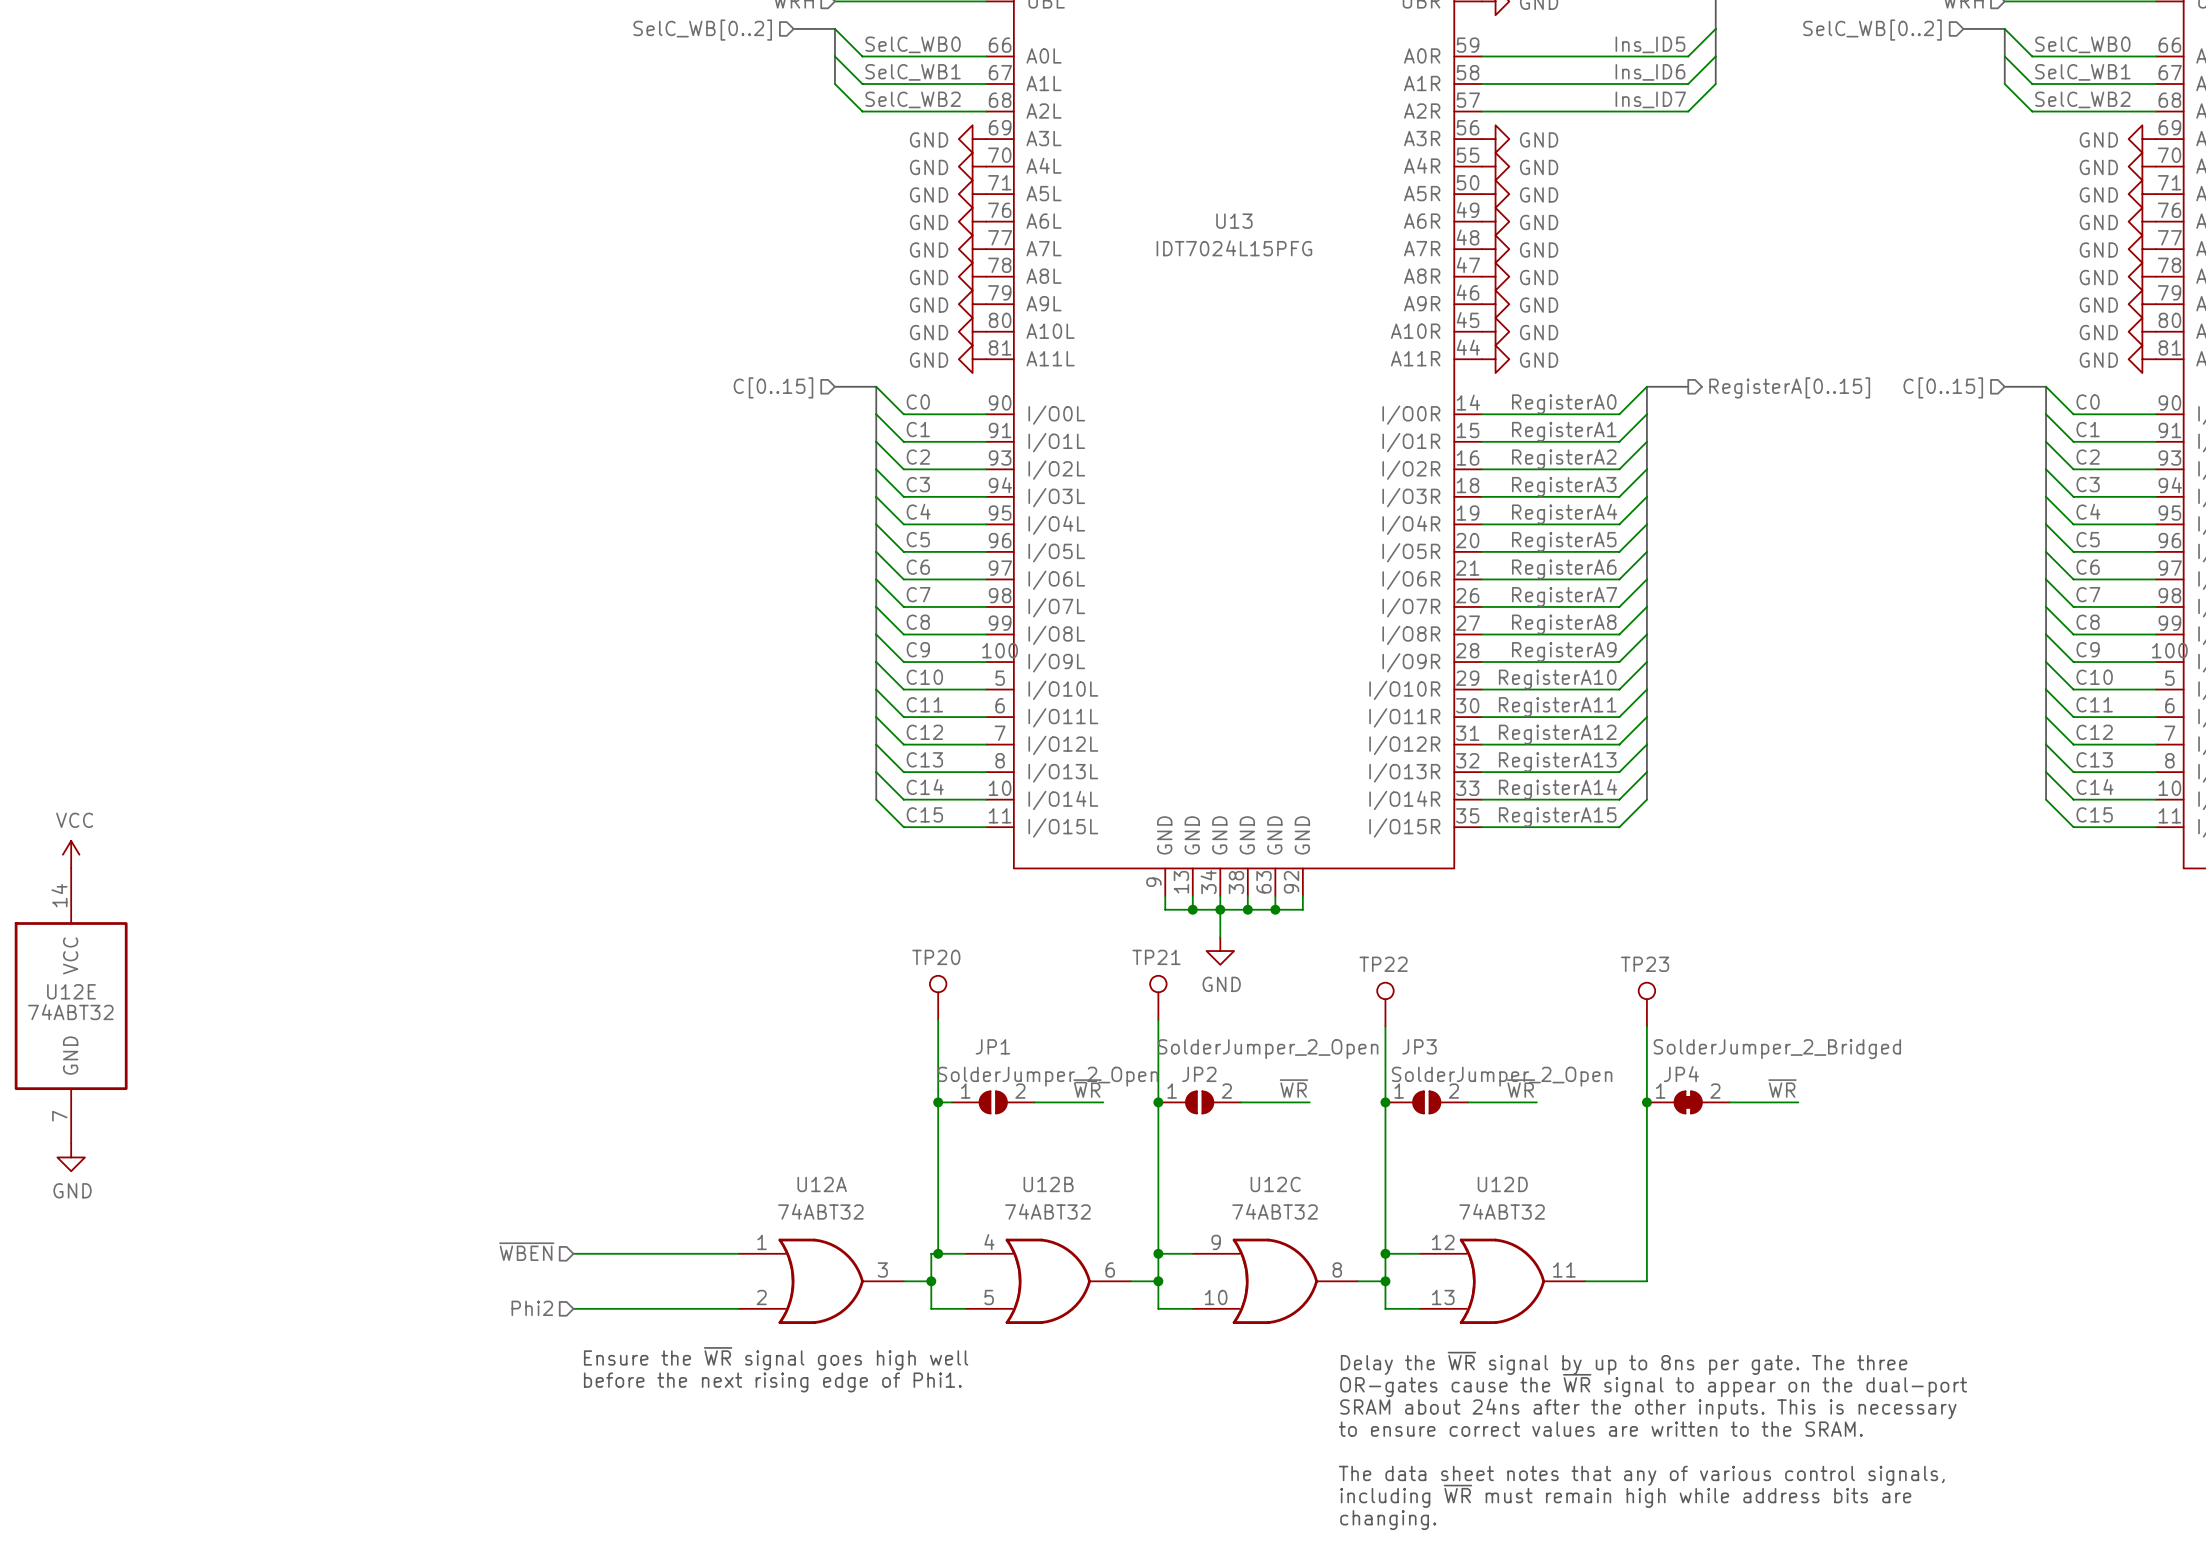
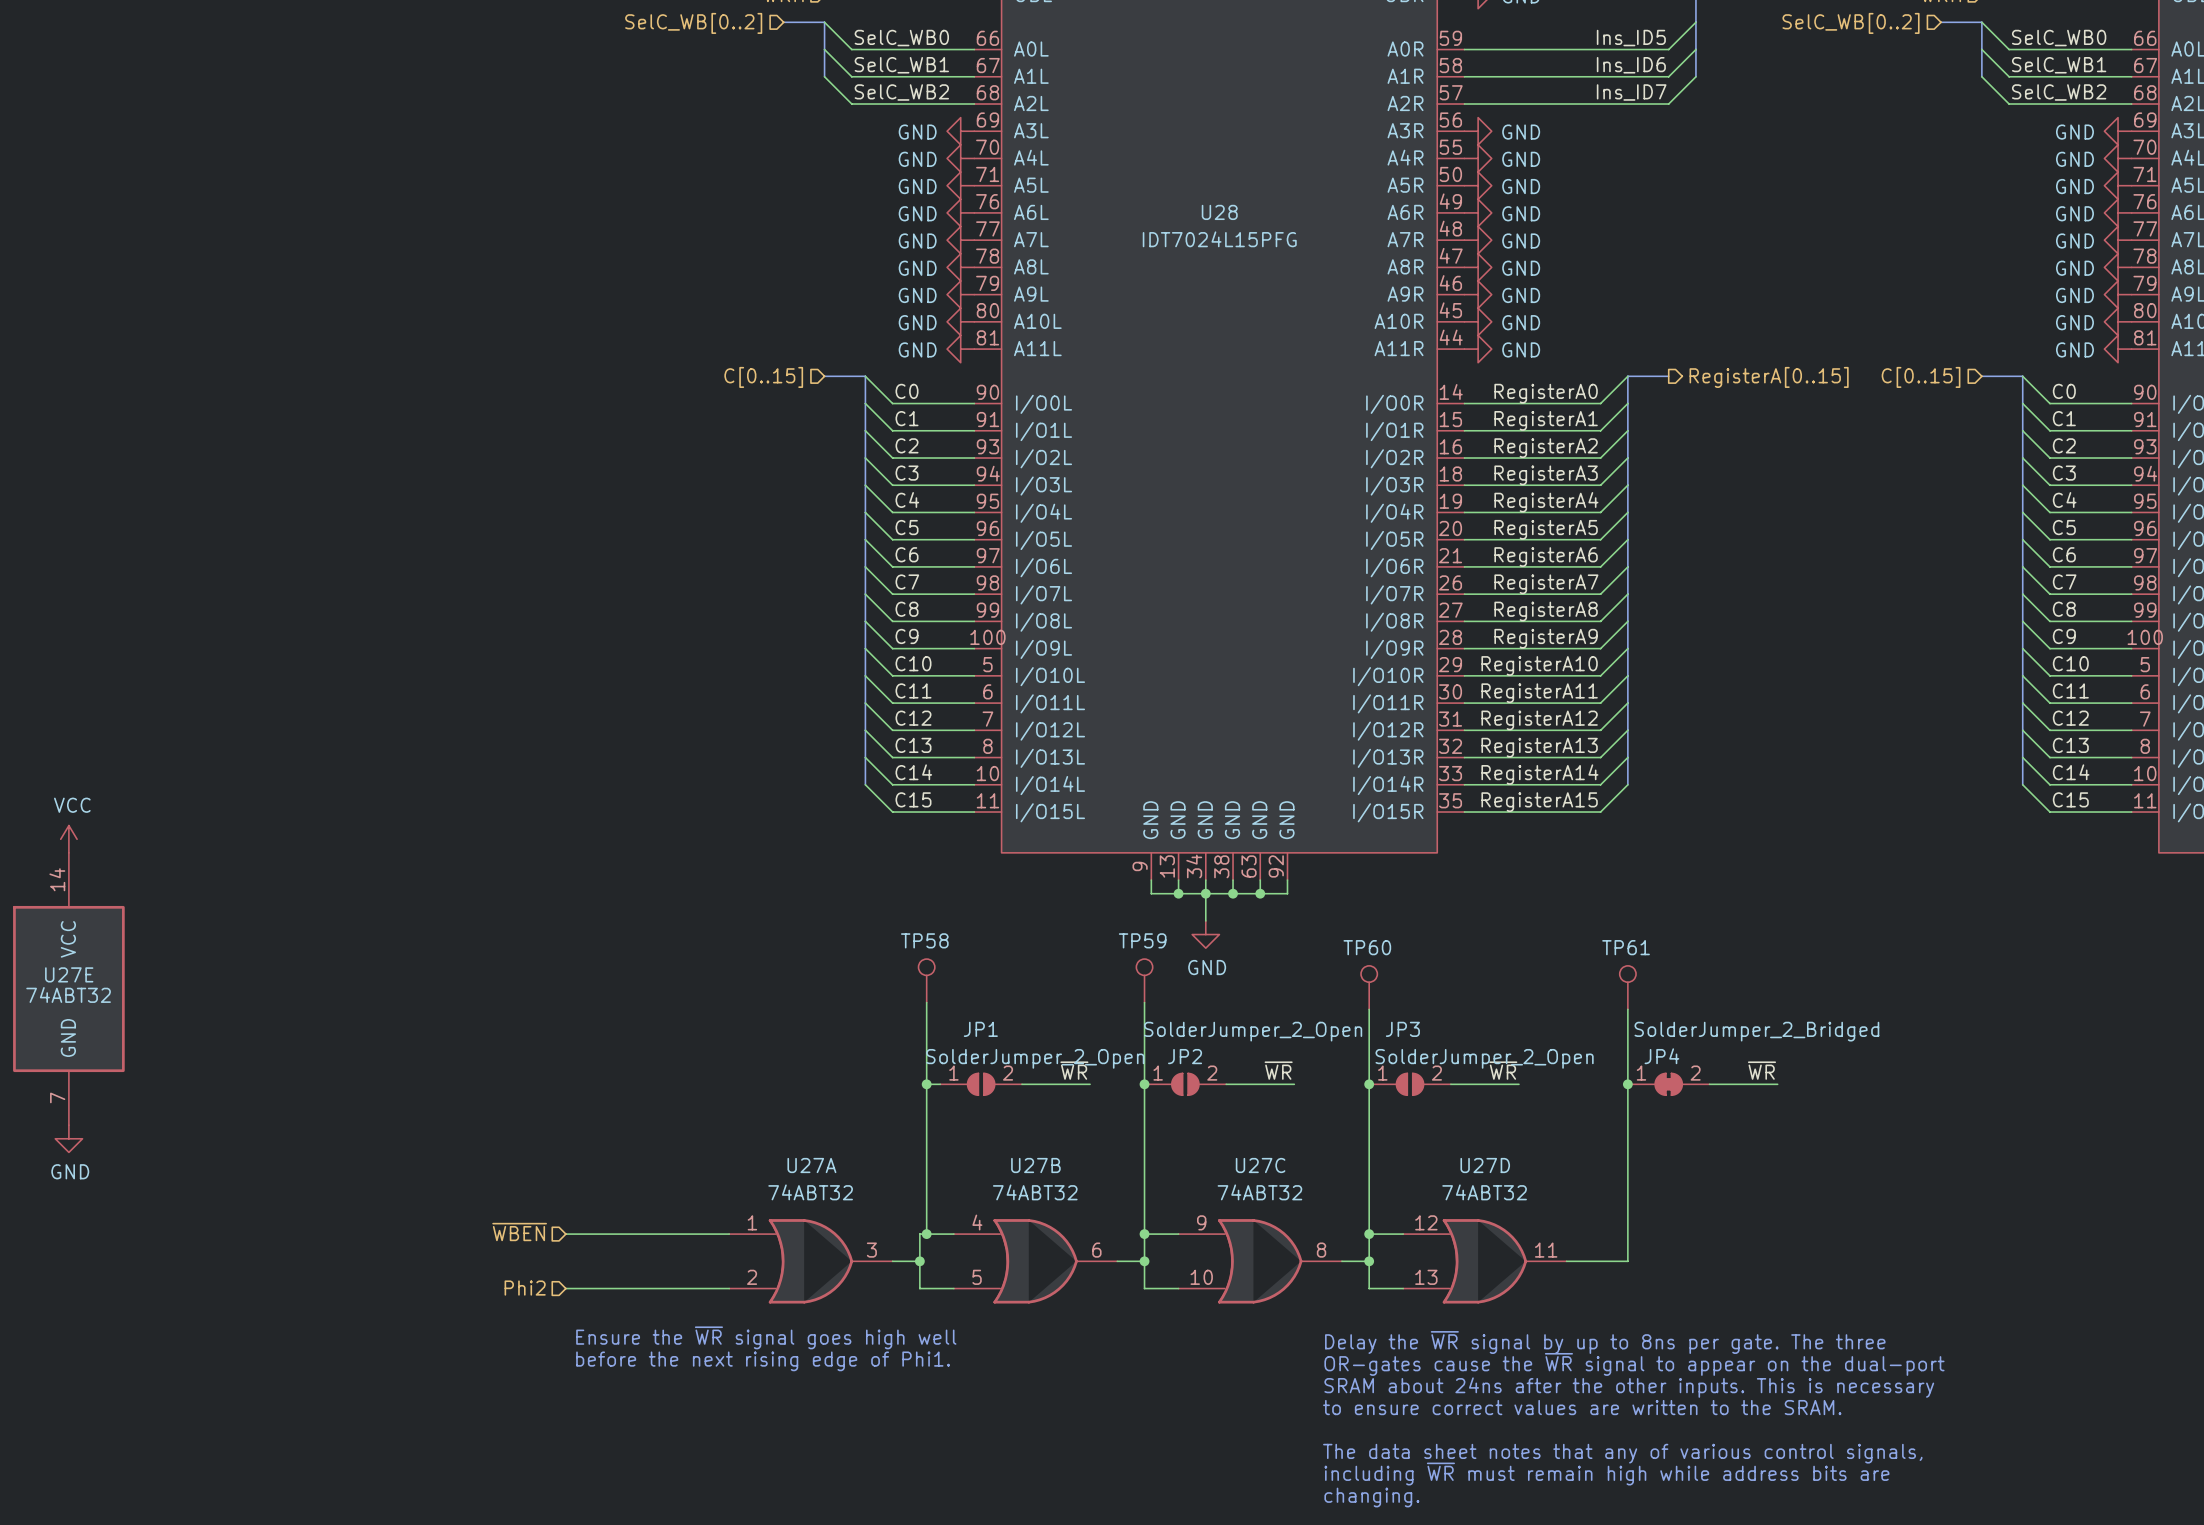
U13 name: U13 (1234, 221) -> U28 (1219, 212)
TP20 name: TP20 (936, 957) -> TP58 (924, 940)
TP21 name: TP21 (1156, 957) -> TP59 (1142, 940)
TP22 name: TP22 (1383, 964) -> TP60 (1367, 947)
TP23 name: TP23 (1645, 964) -> TP61 (1626, 947)
U12E name: U12E (71, 991) -> U27E (69, 974)
U12A name: U12A (822, 1184) -> U27A (811, 1165)
U12B name: U12B (1048, 1184) -> U27B (1035, 1165)
U12C name: U12C (1275, 1184) -> U27C (1260, 1165)
U12D name: U12D (1502, 1184) -> U27D (1485, 1165)

